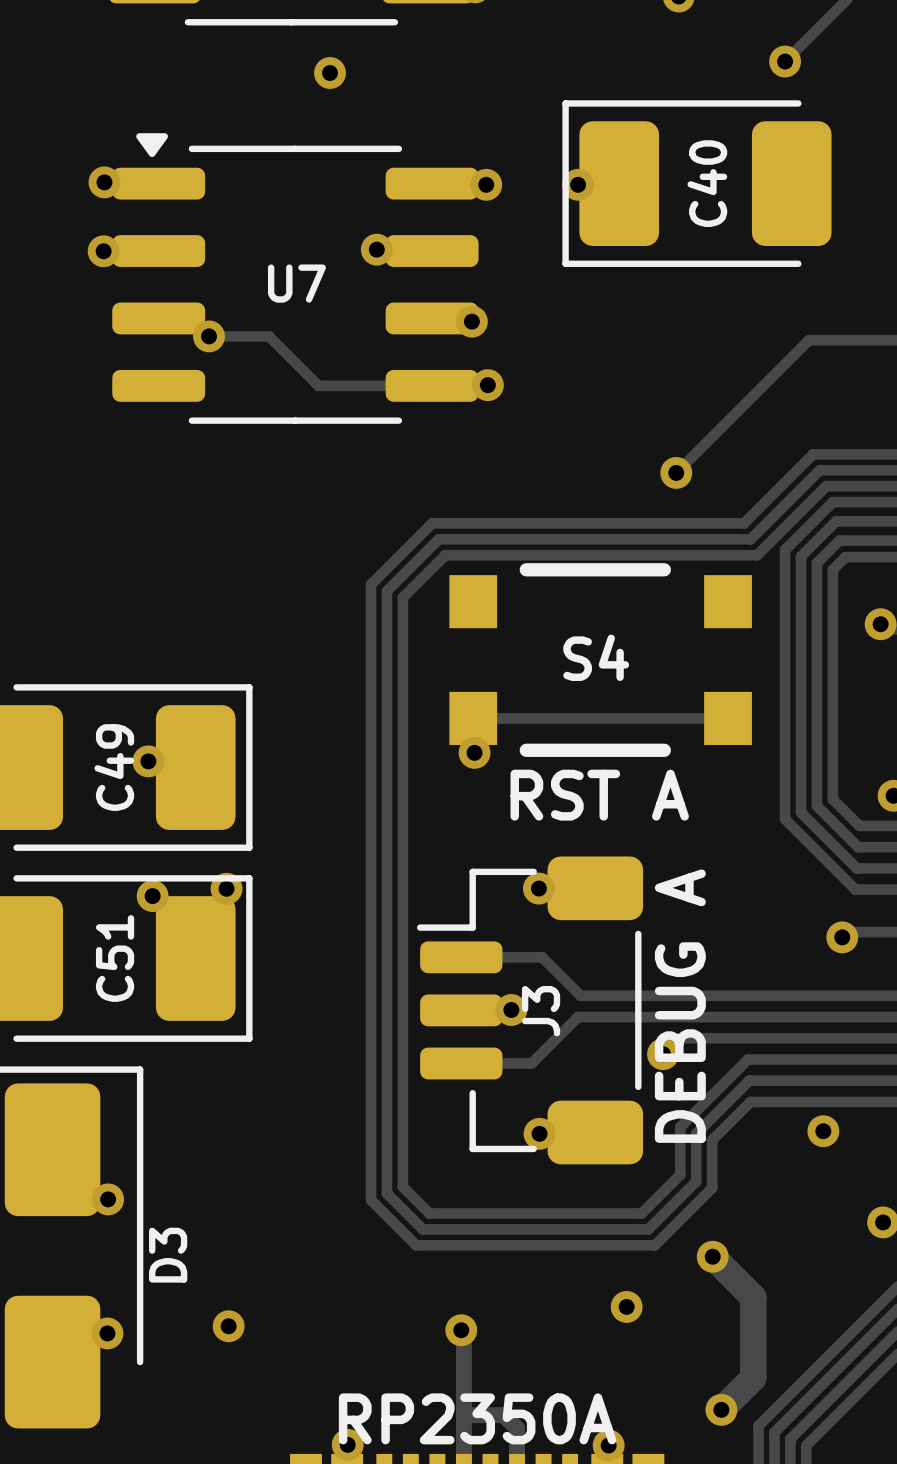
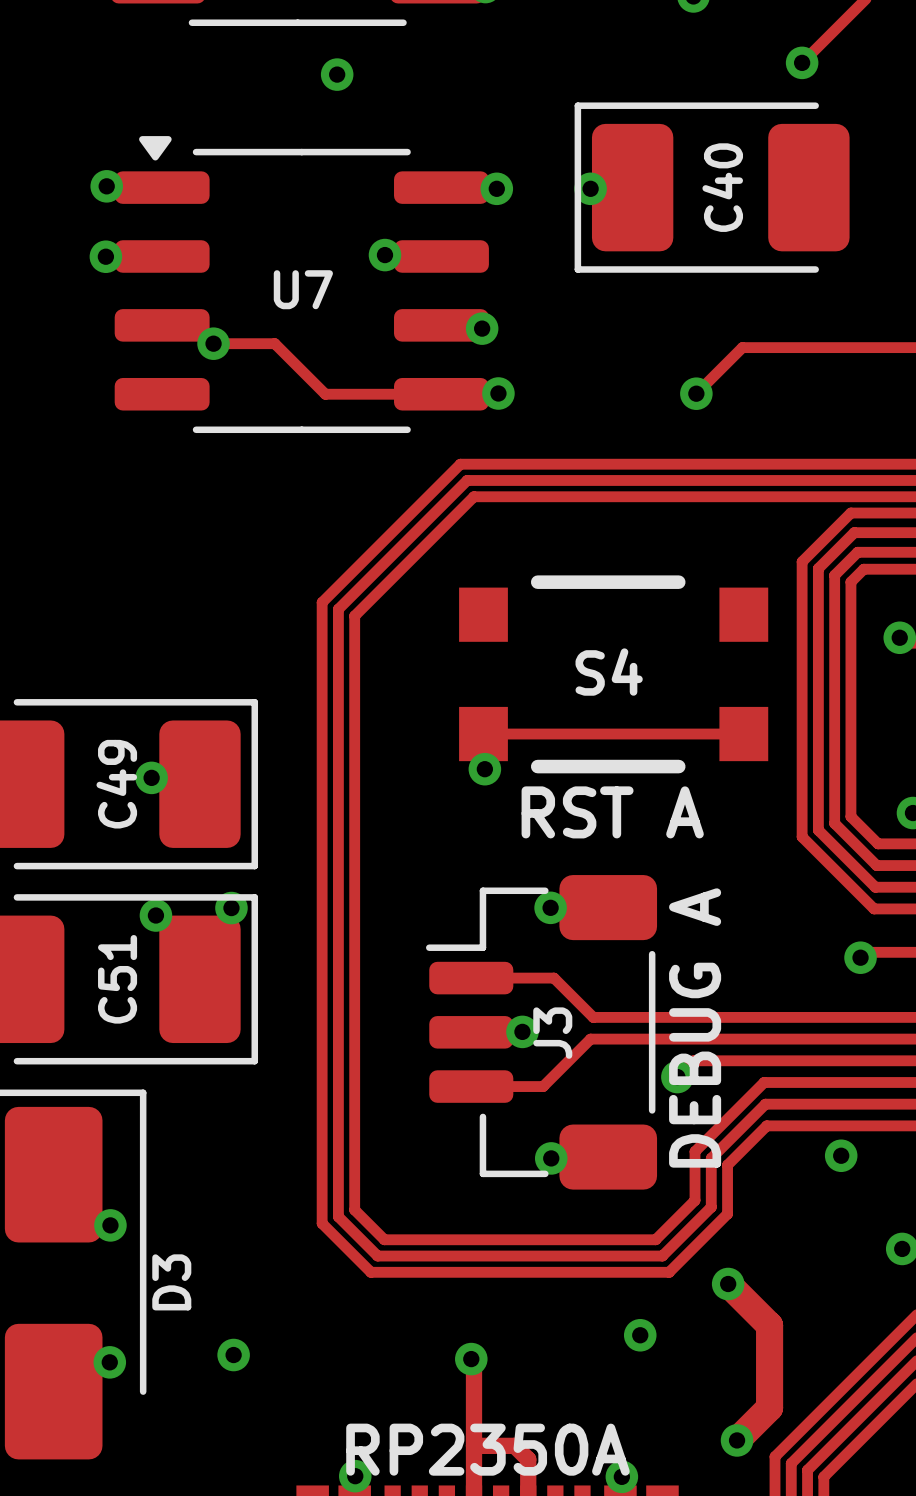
track: (808, 340) (676, 472) -> (826, 347) (742, 347) (696, 393)
track: (813, 454) (744, 523) (432, 523) (371, 584) (371, 1200) (416, 1245) -> (830, 464) (460, 464) (322, 602) (322, 1223) (370, 1272) (425, 1272)
track: (819, 470) (750, 539) (438, 539) (386, 591) (386, 1193) (422, 1229) -> (837, 480) (467, 480) (338, 609) (338, 1216) (377, 1256) (432, 1256)
via position: (676, 472) -> (696, 393)
track: (826, 486) (757, 555) (445, 555) (402, 597) (402, 1186) (429, 1213) -> (844, 496) (473, 496) (354, 615) (354, 1210) (384, 1239) (438, 1239)

